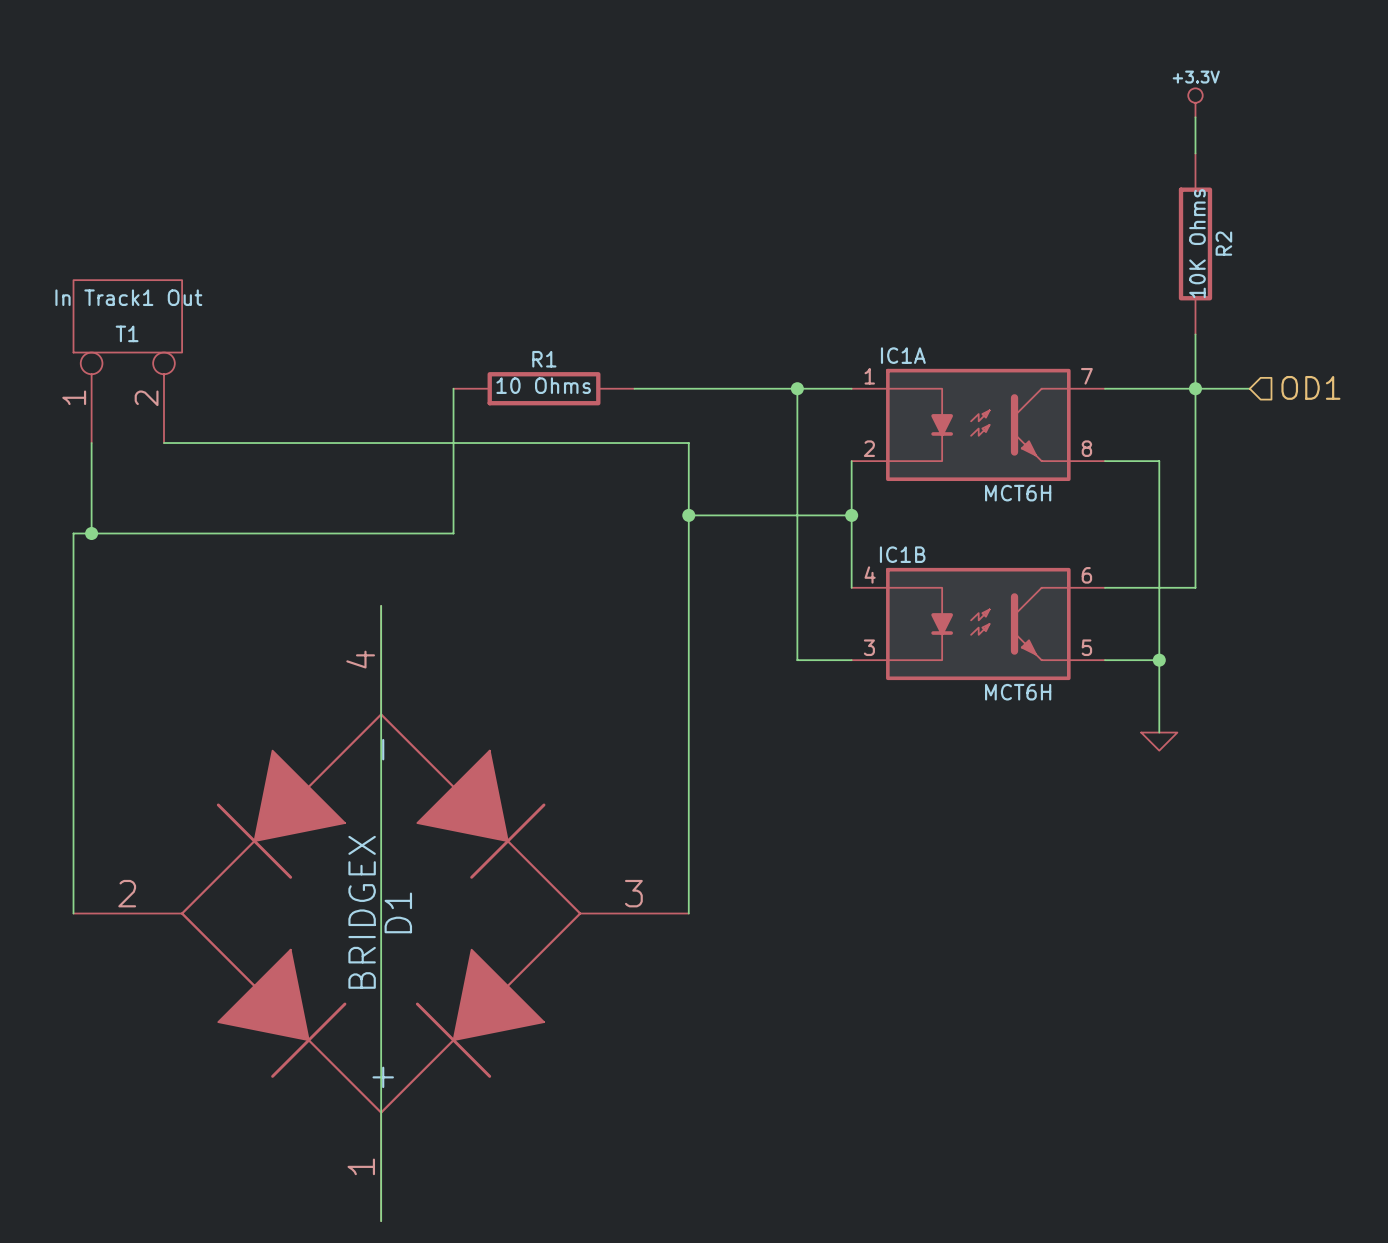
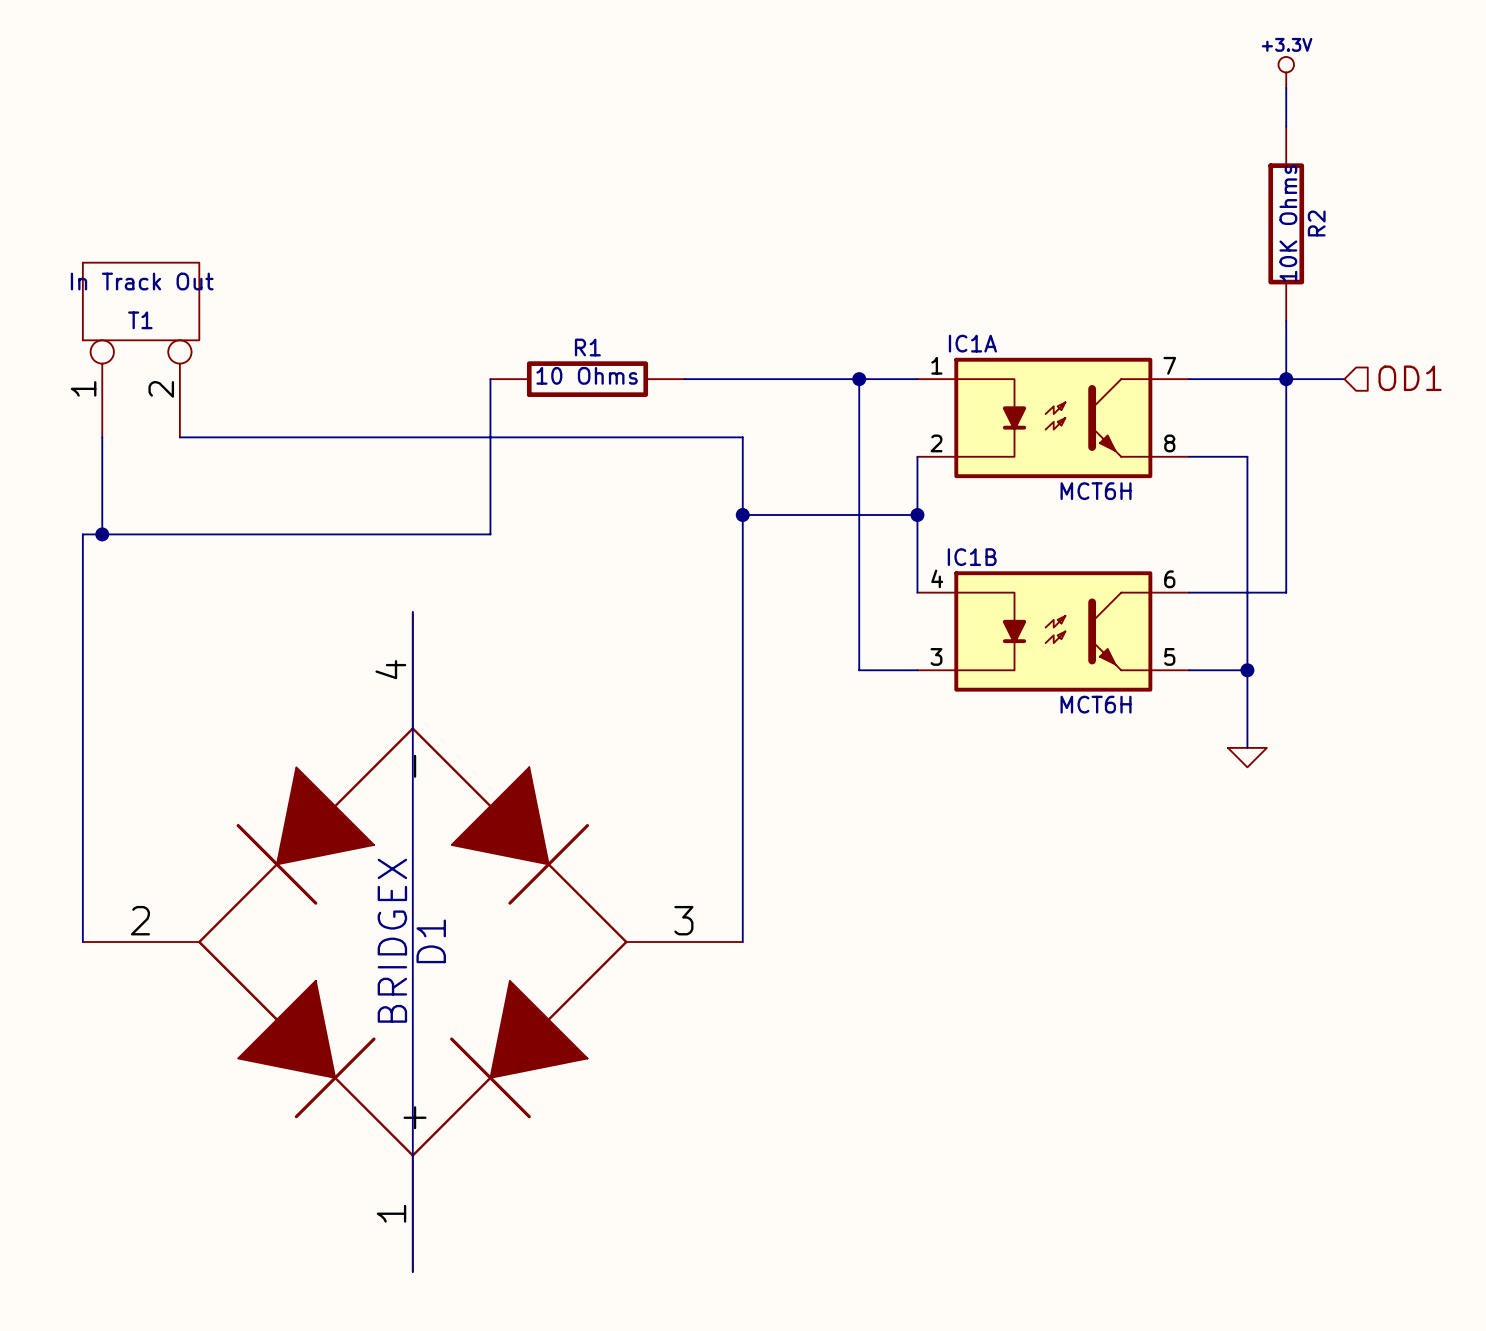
T1 value: In Track1 Out (128, 297) -> In Track Out (142, 281)

